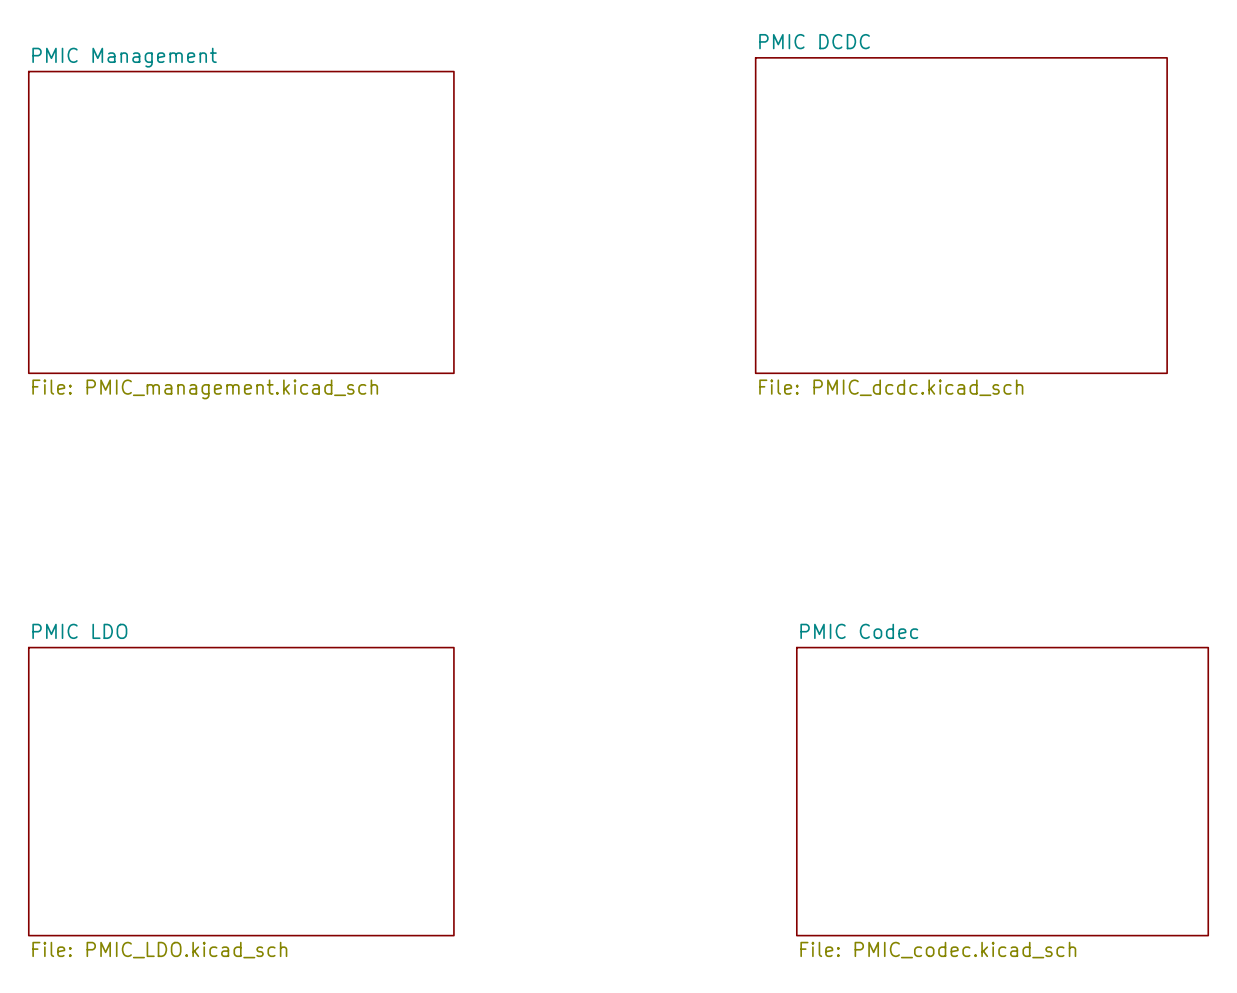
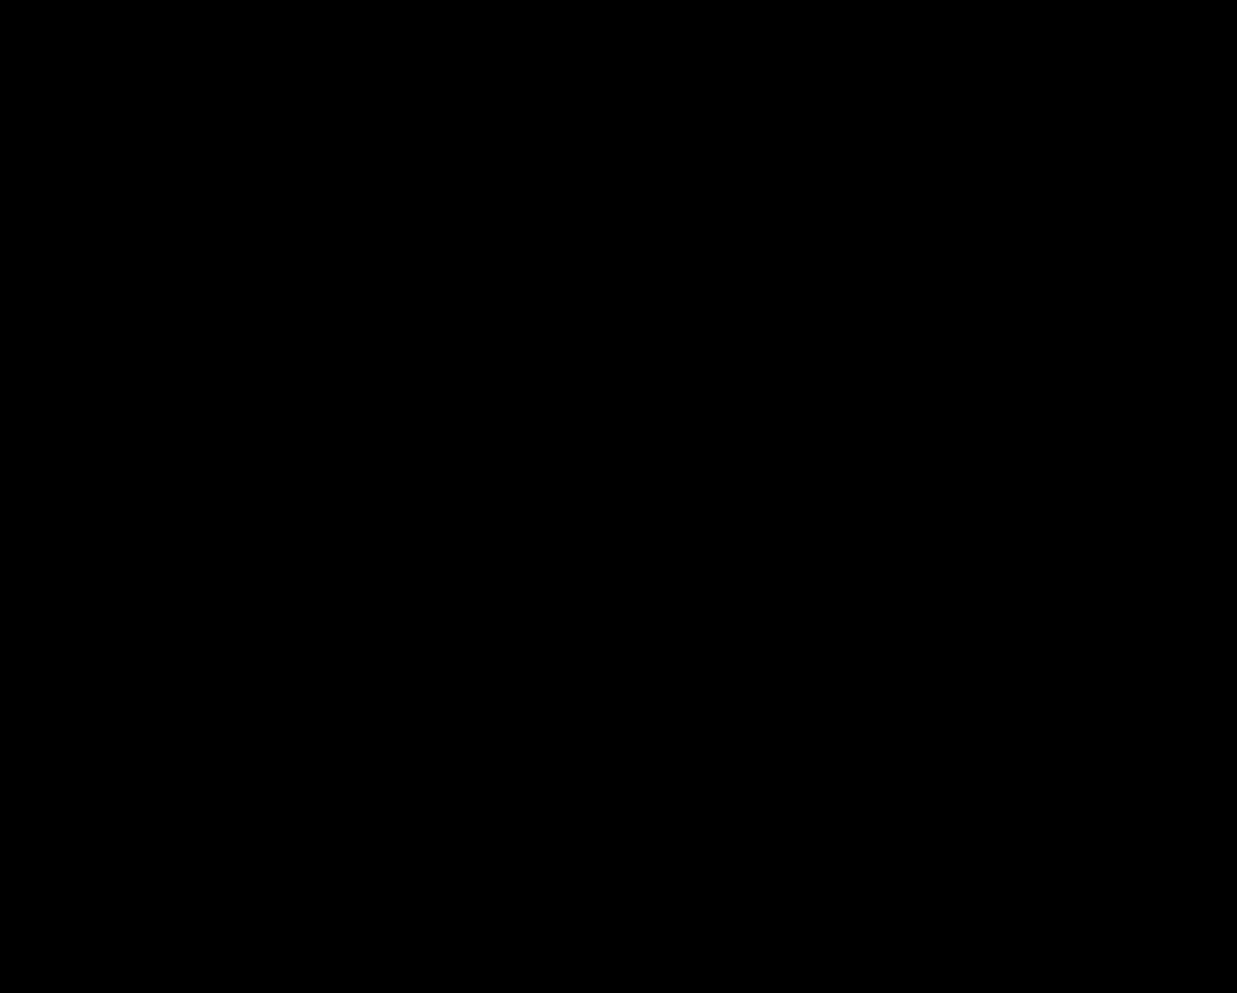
sheet PMIC DCDC: File: PMIC_dcdc.kicad_sch (961, 215) -> none
sheet PMIC Management: File: PMIC_management.kicad_sch (241, 222) -> none
sheet PMIC LDO: File: PMIC_LDO.kicad_sch (241, 791) -> none
sheet PMIC Codec: File: PMIC_codec.kicad_sch (1002, 791) -> none

